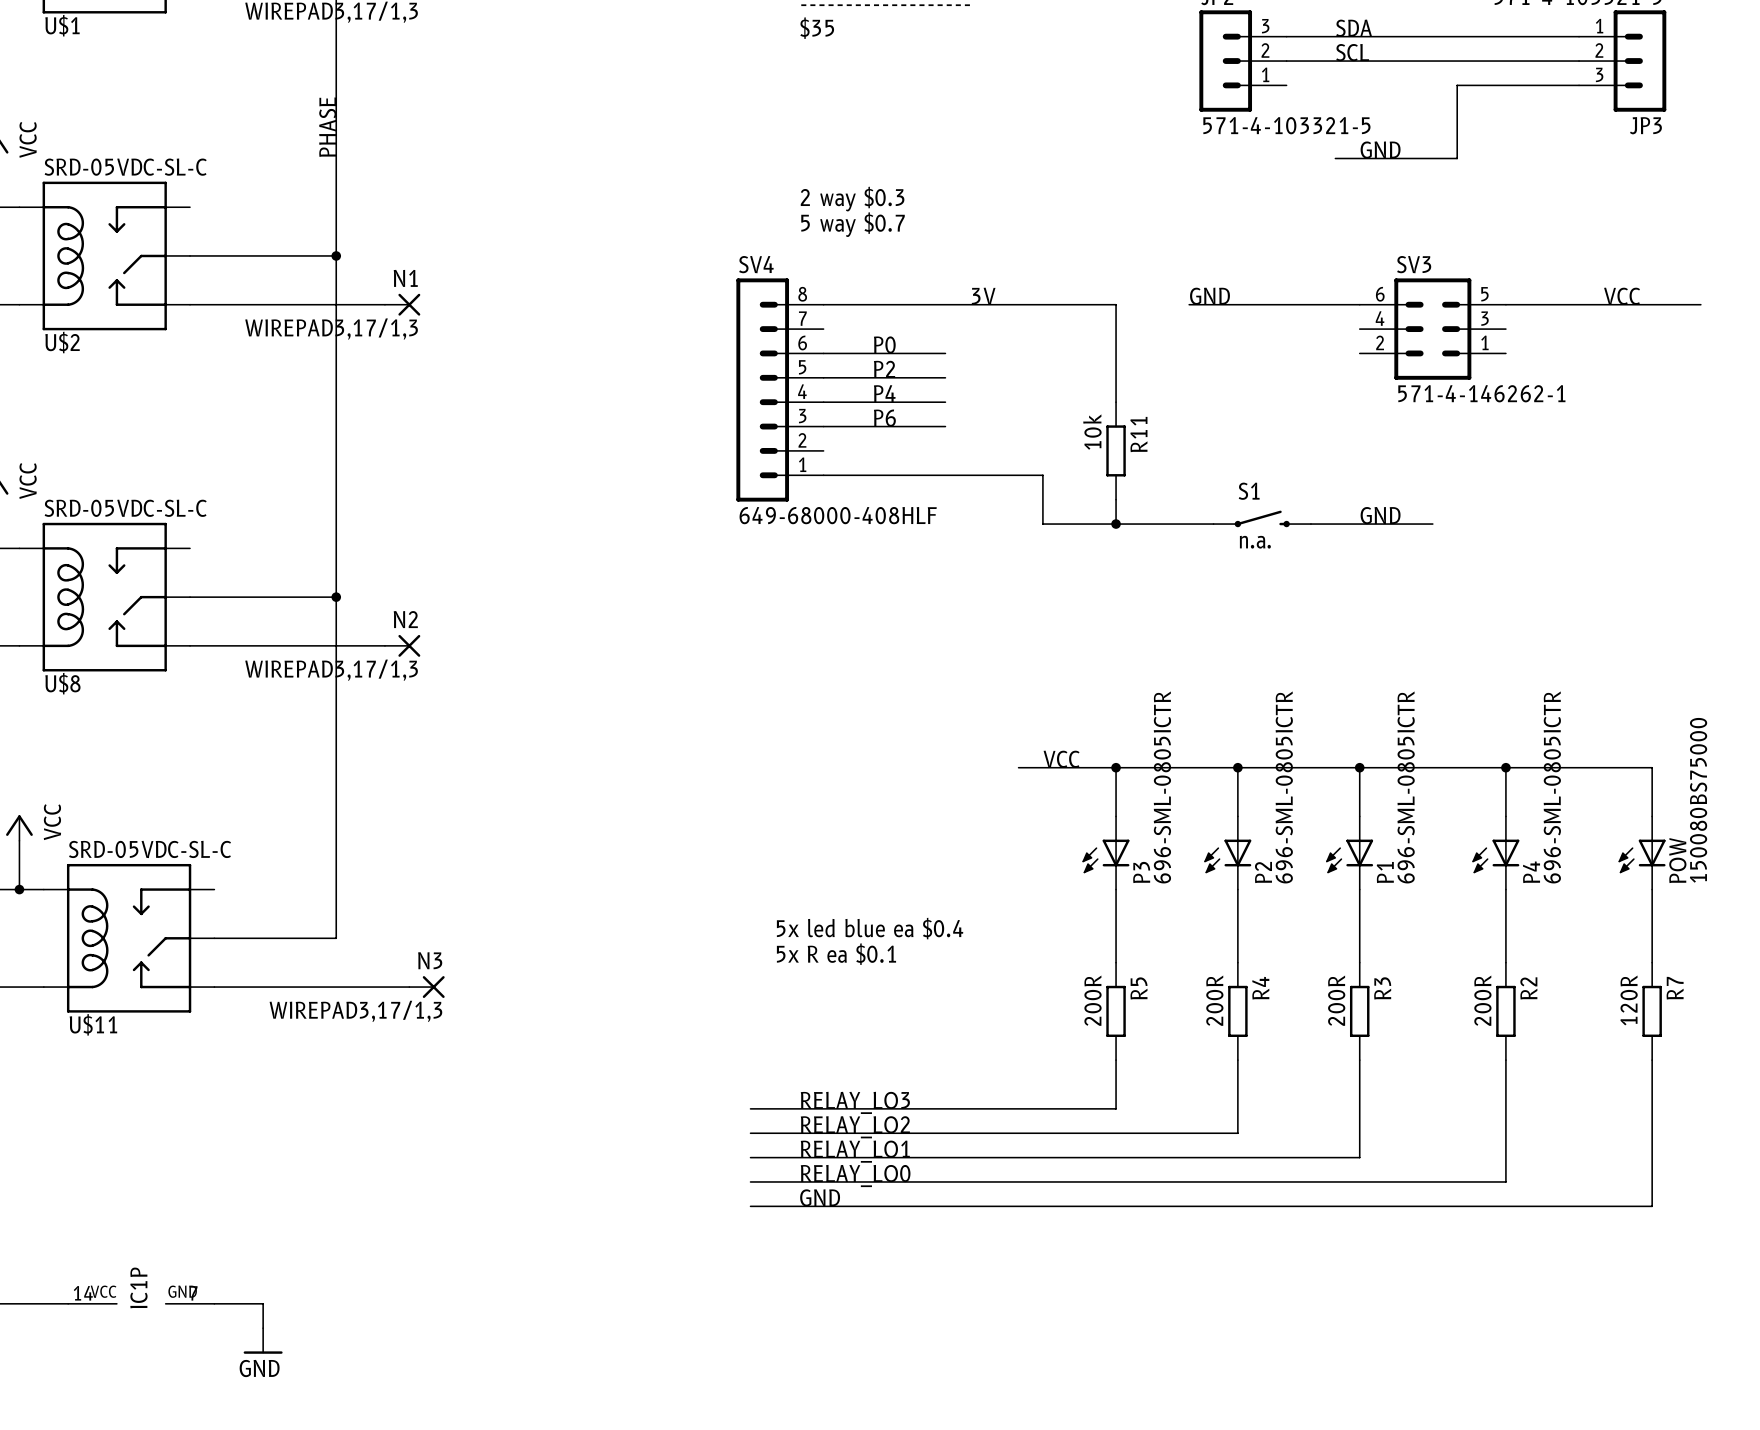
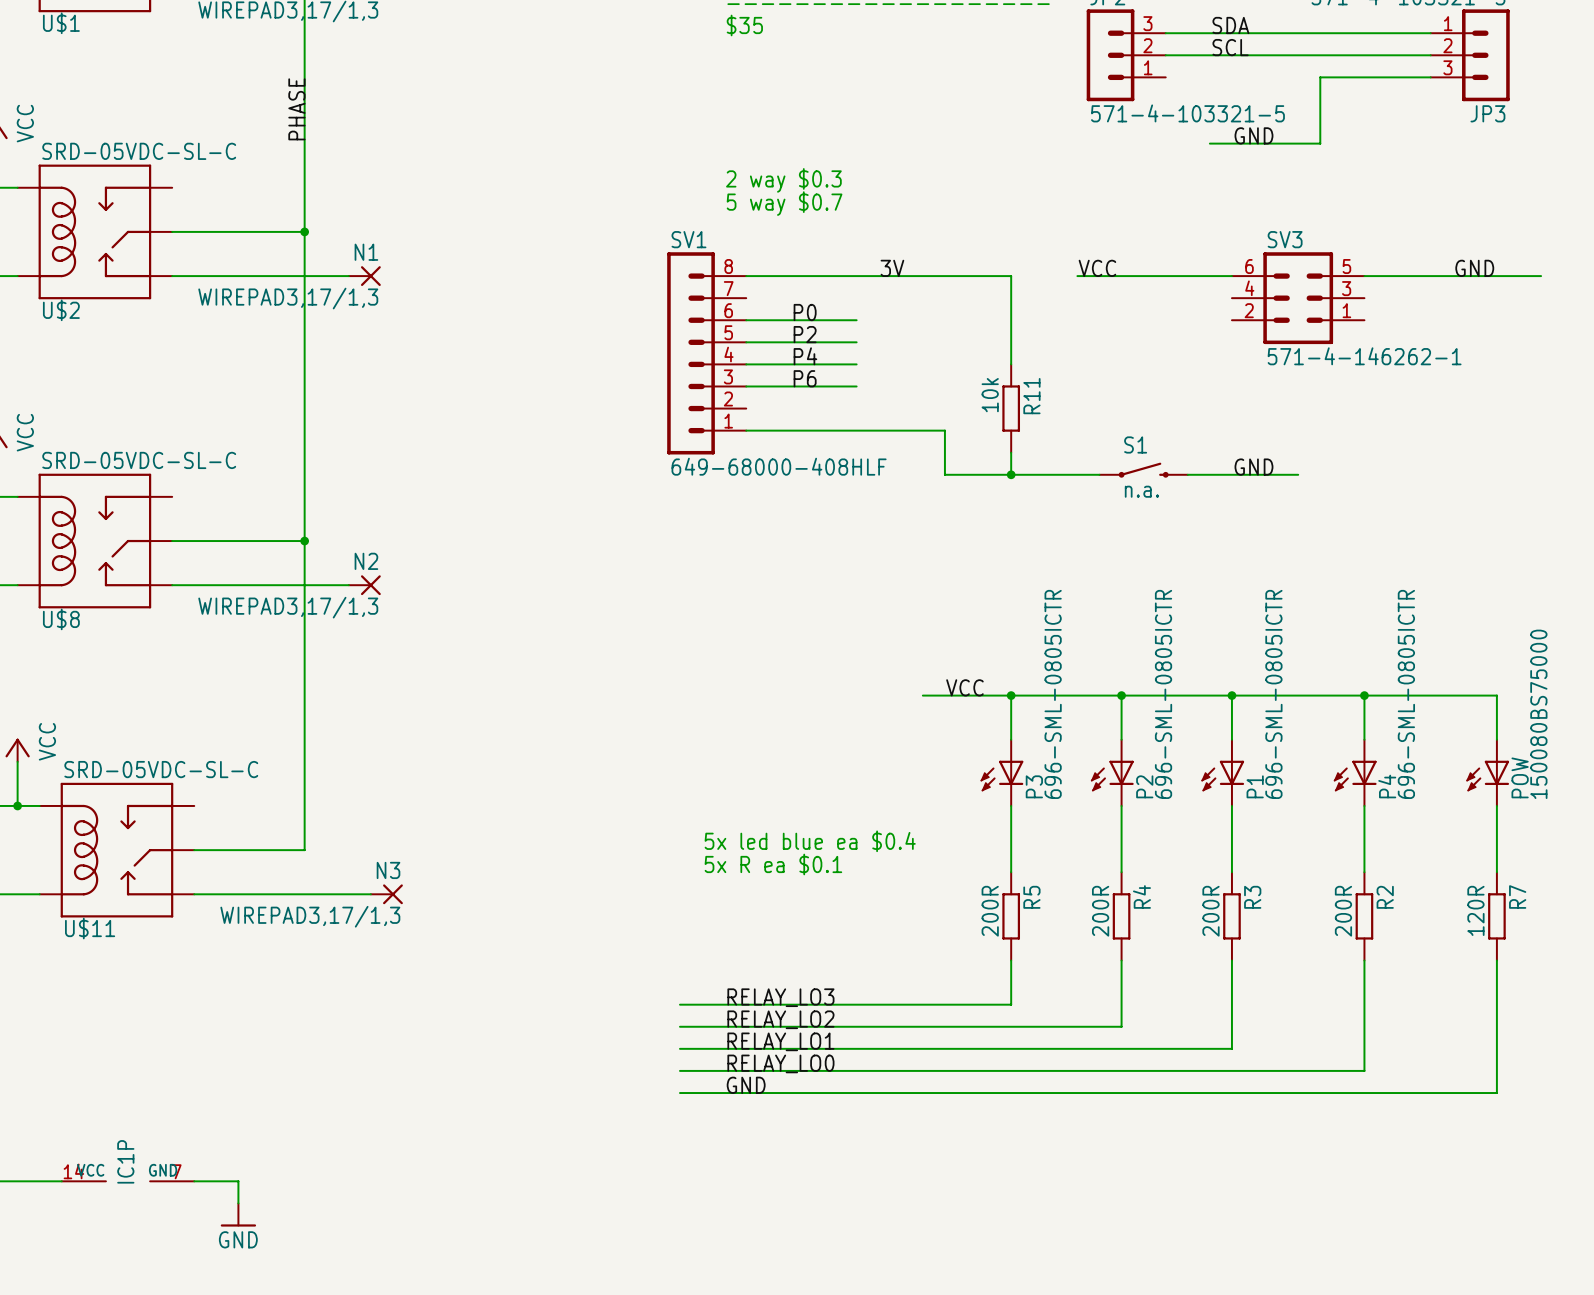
SV4 name: SV4 (756, 264) -> SV1 (688, 239)
label: GND (1209, 296) -> VCC (1097, 268)
label: VCC (1622, 296) -> GND (1474, 268)

